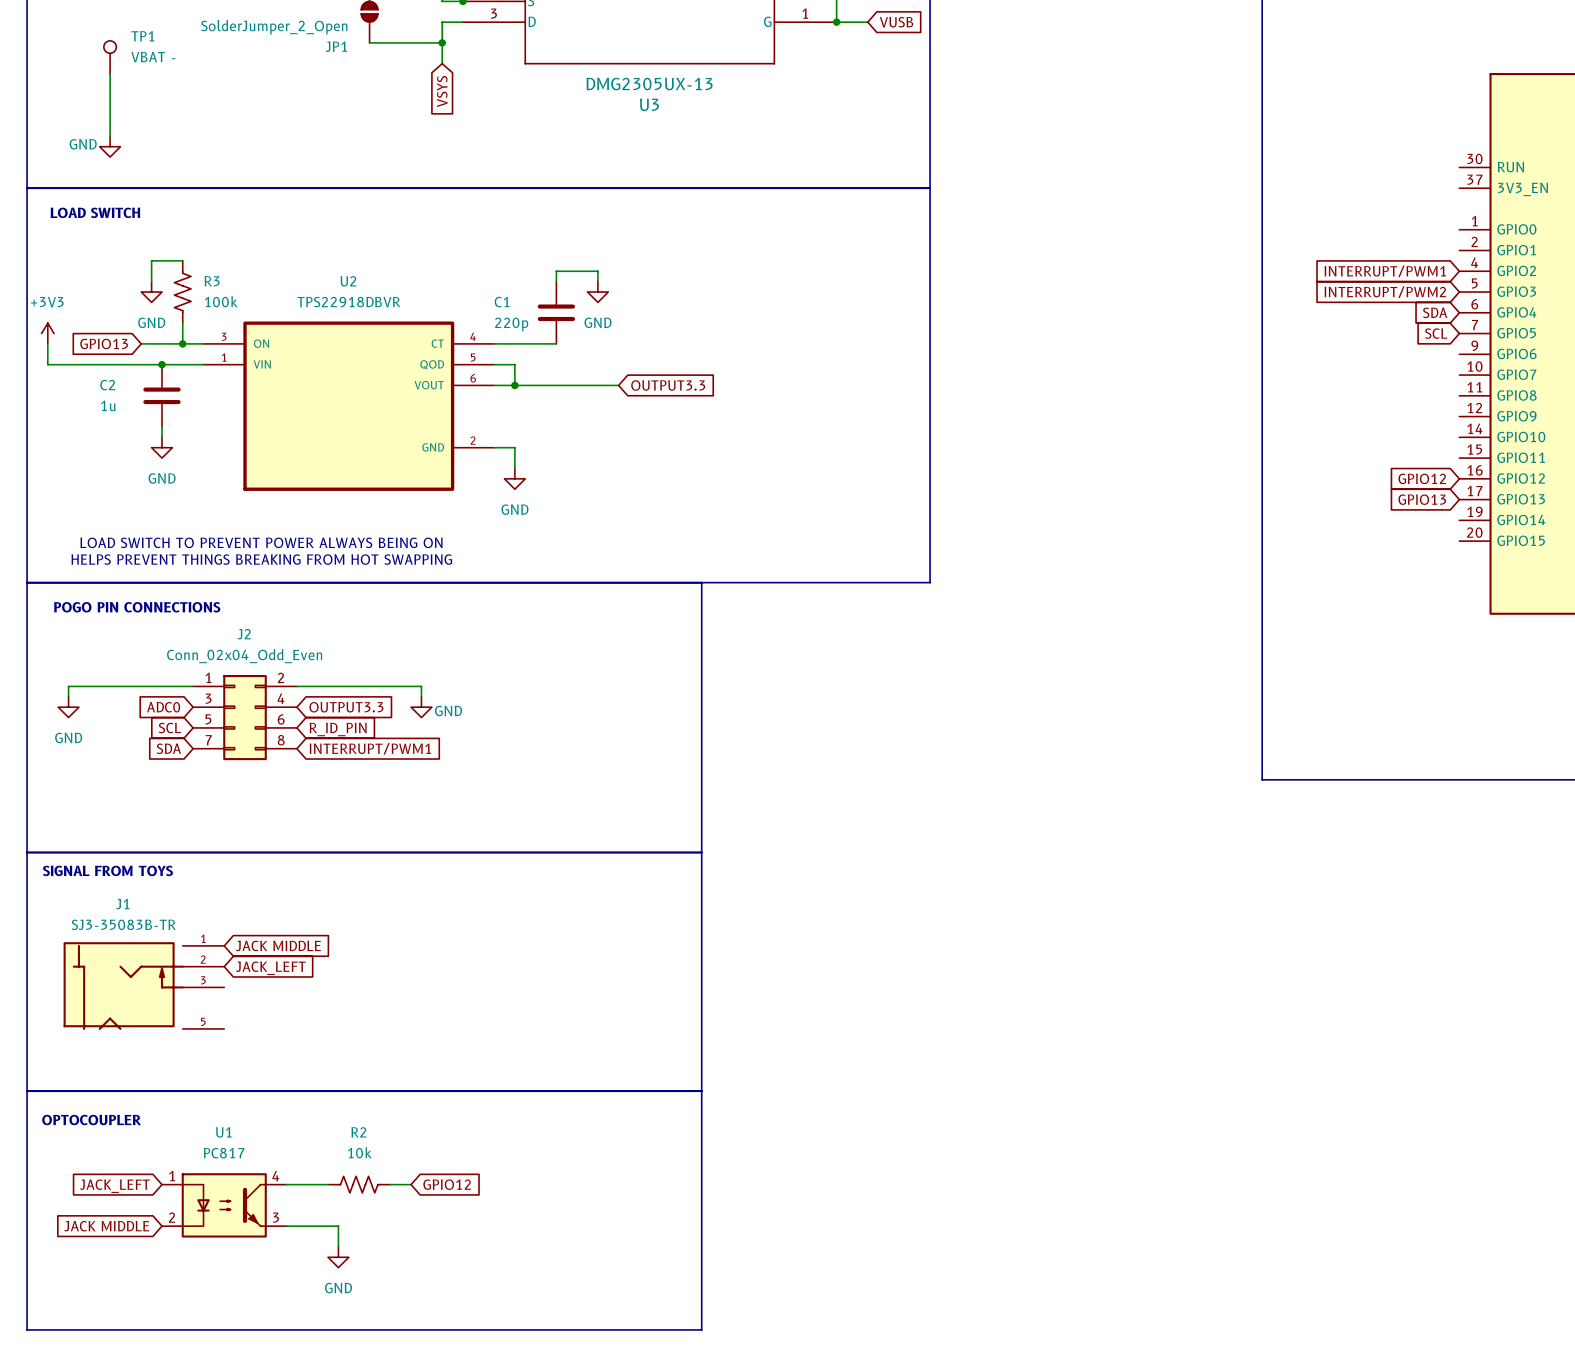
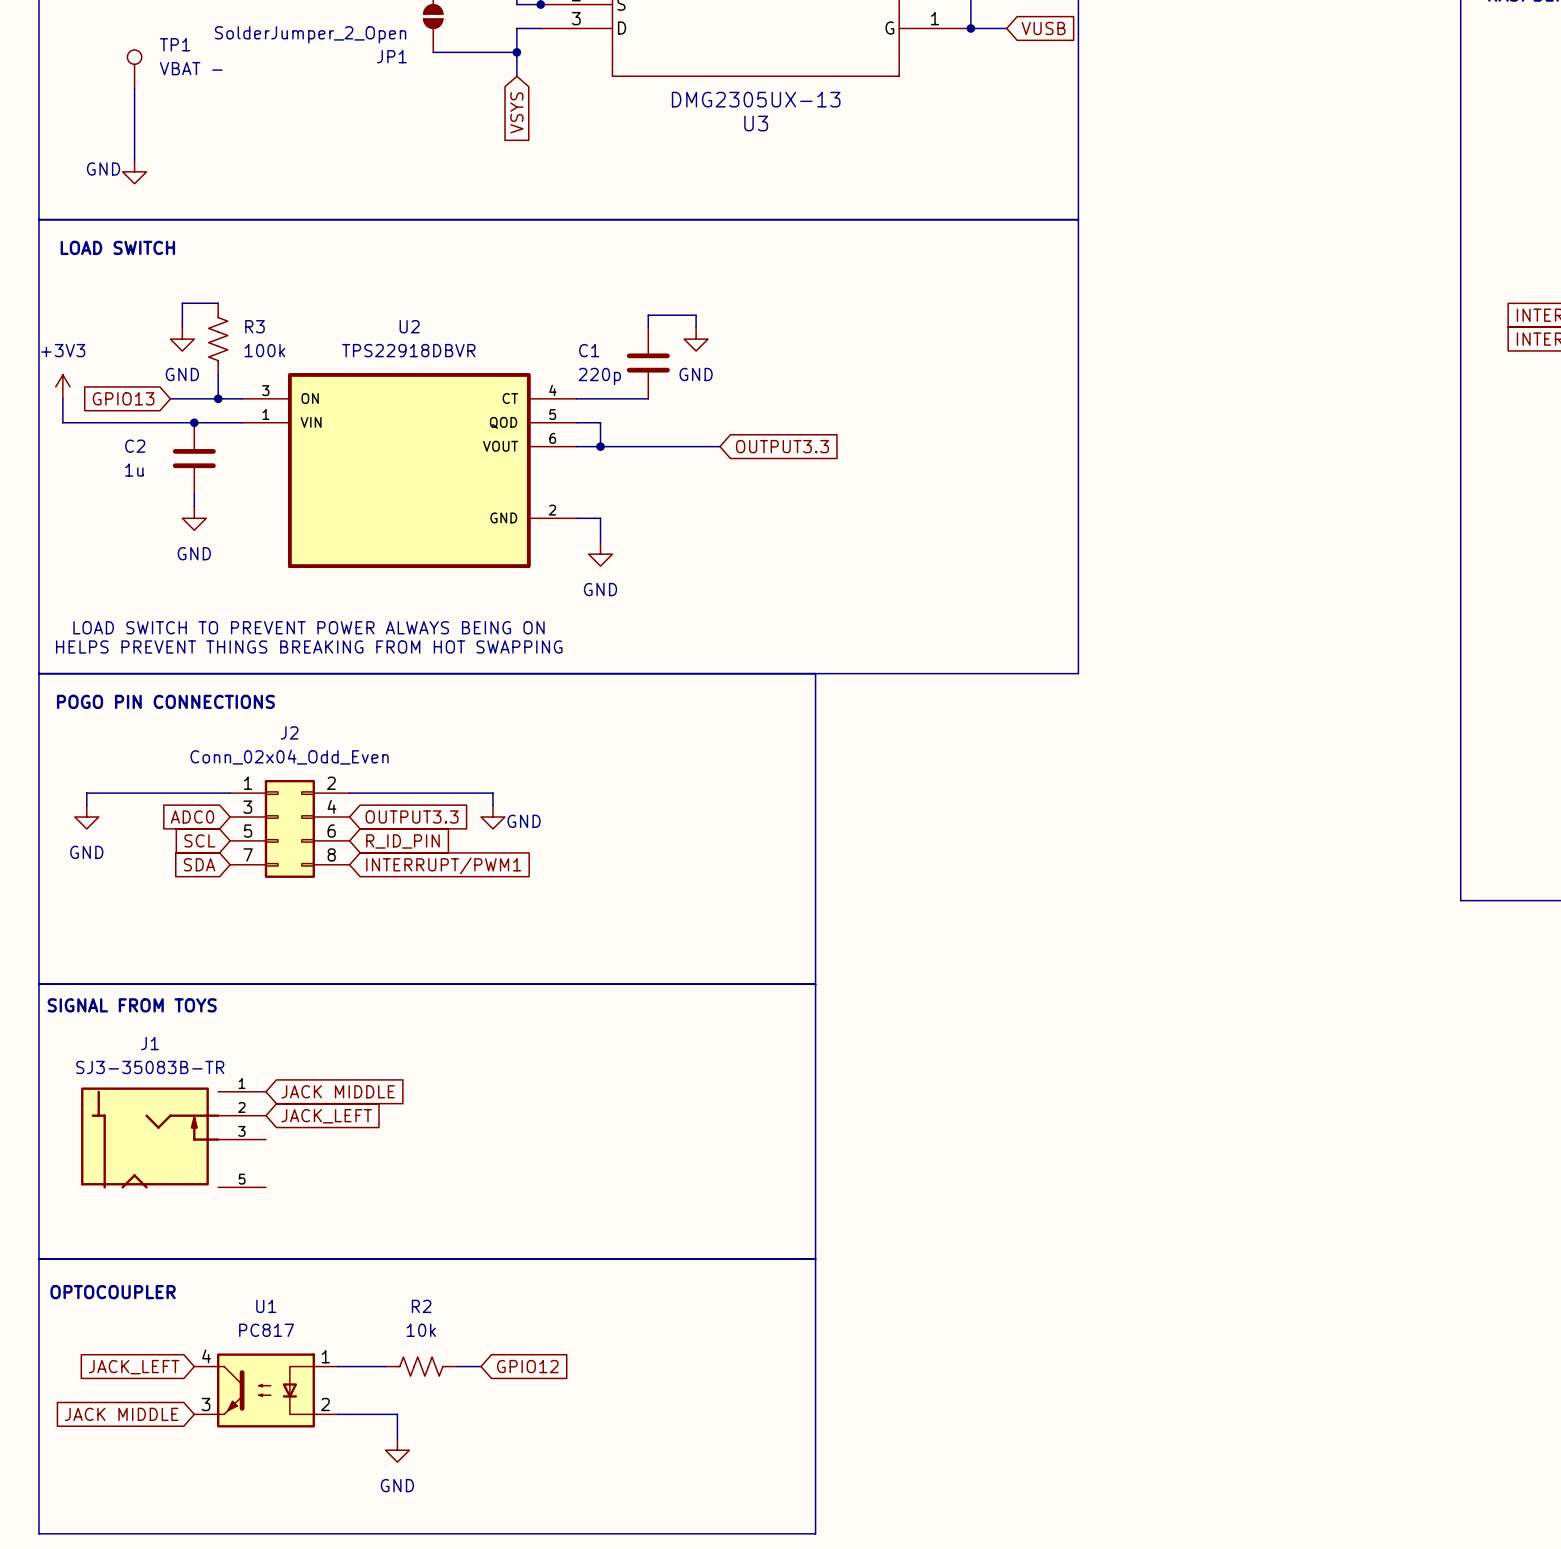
U1 flip: as is (224, 1205) -> left-right (265, 1390)

